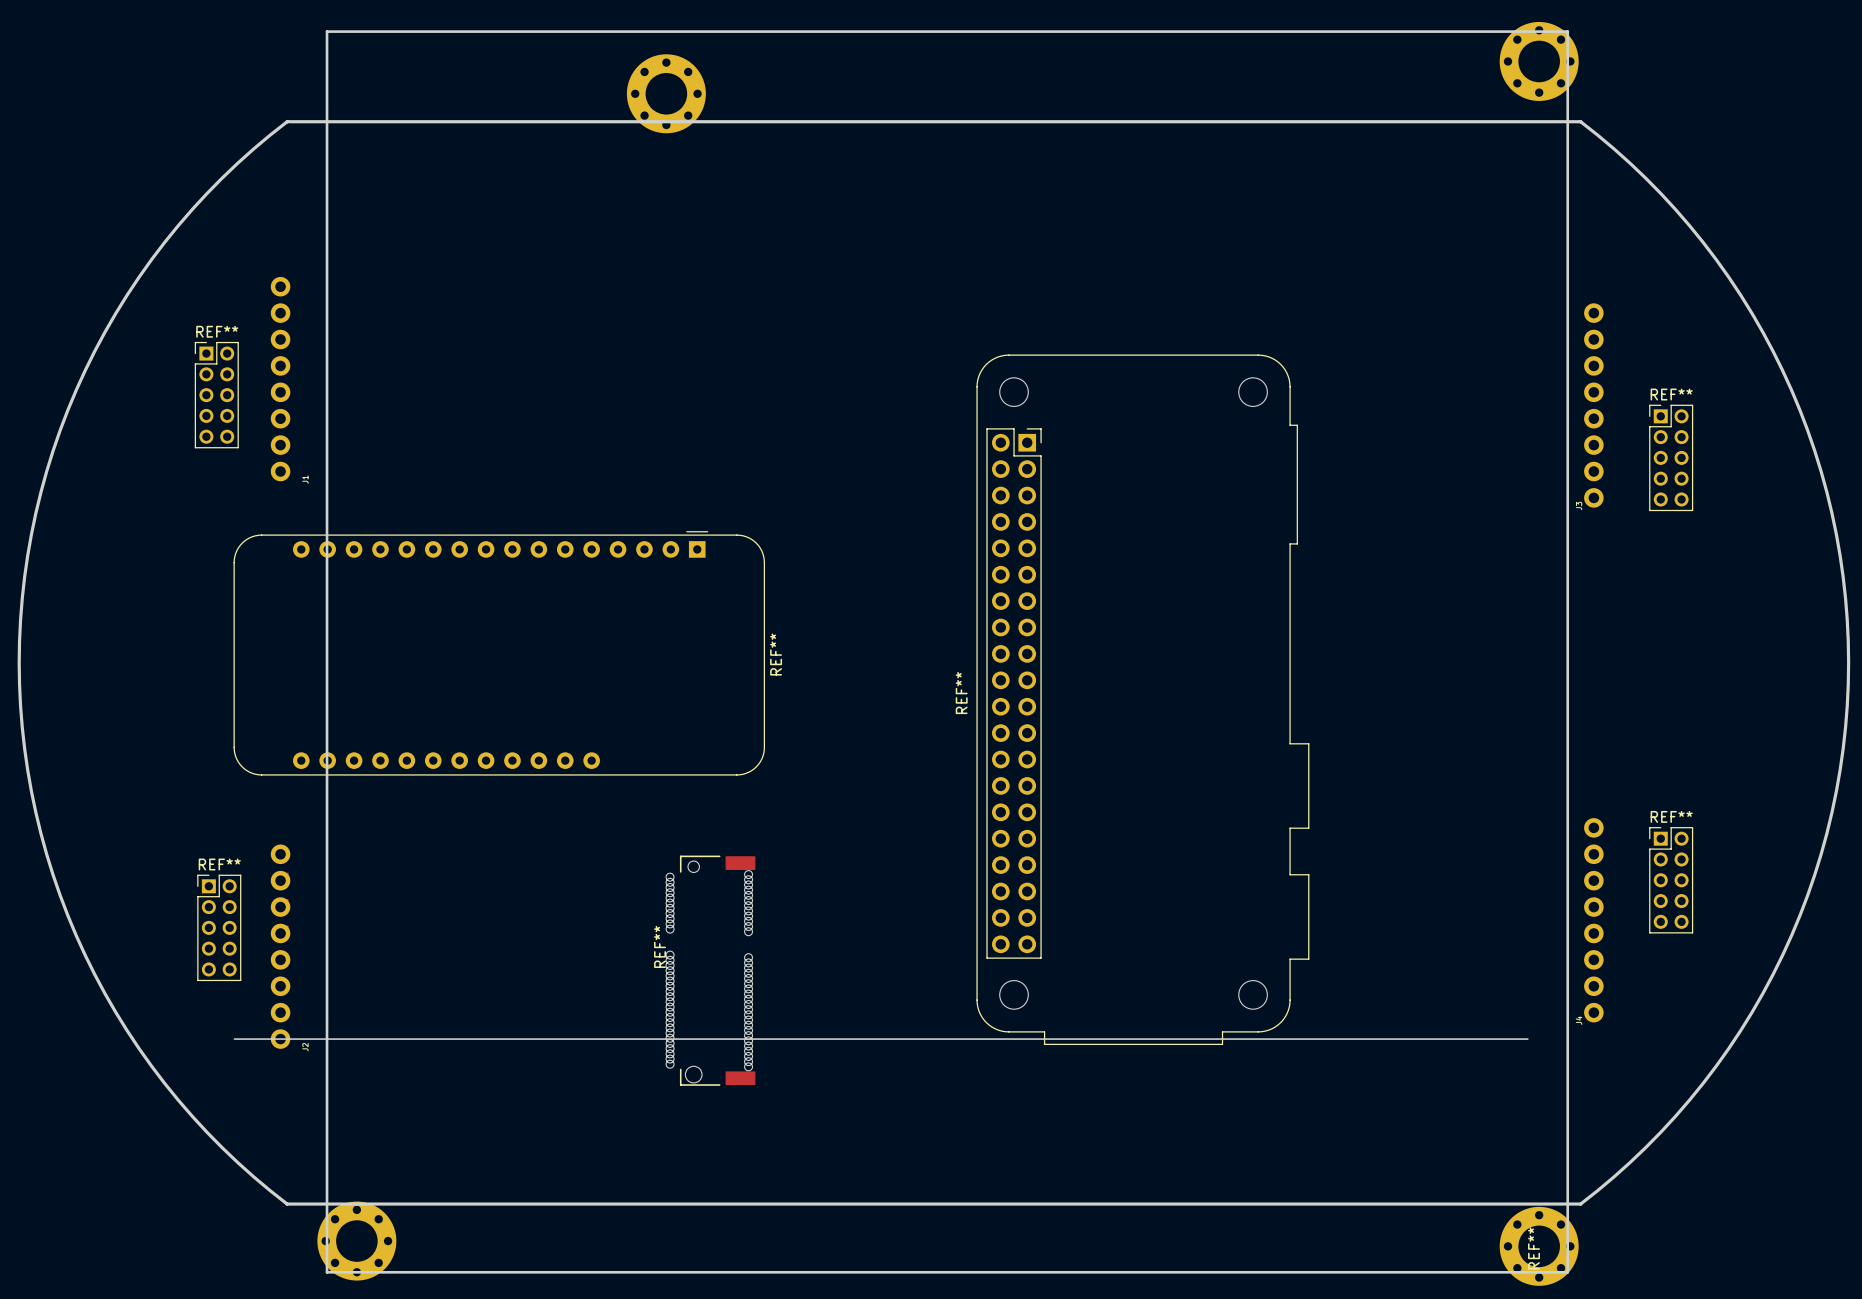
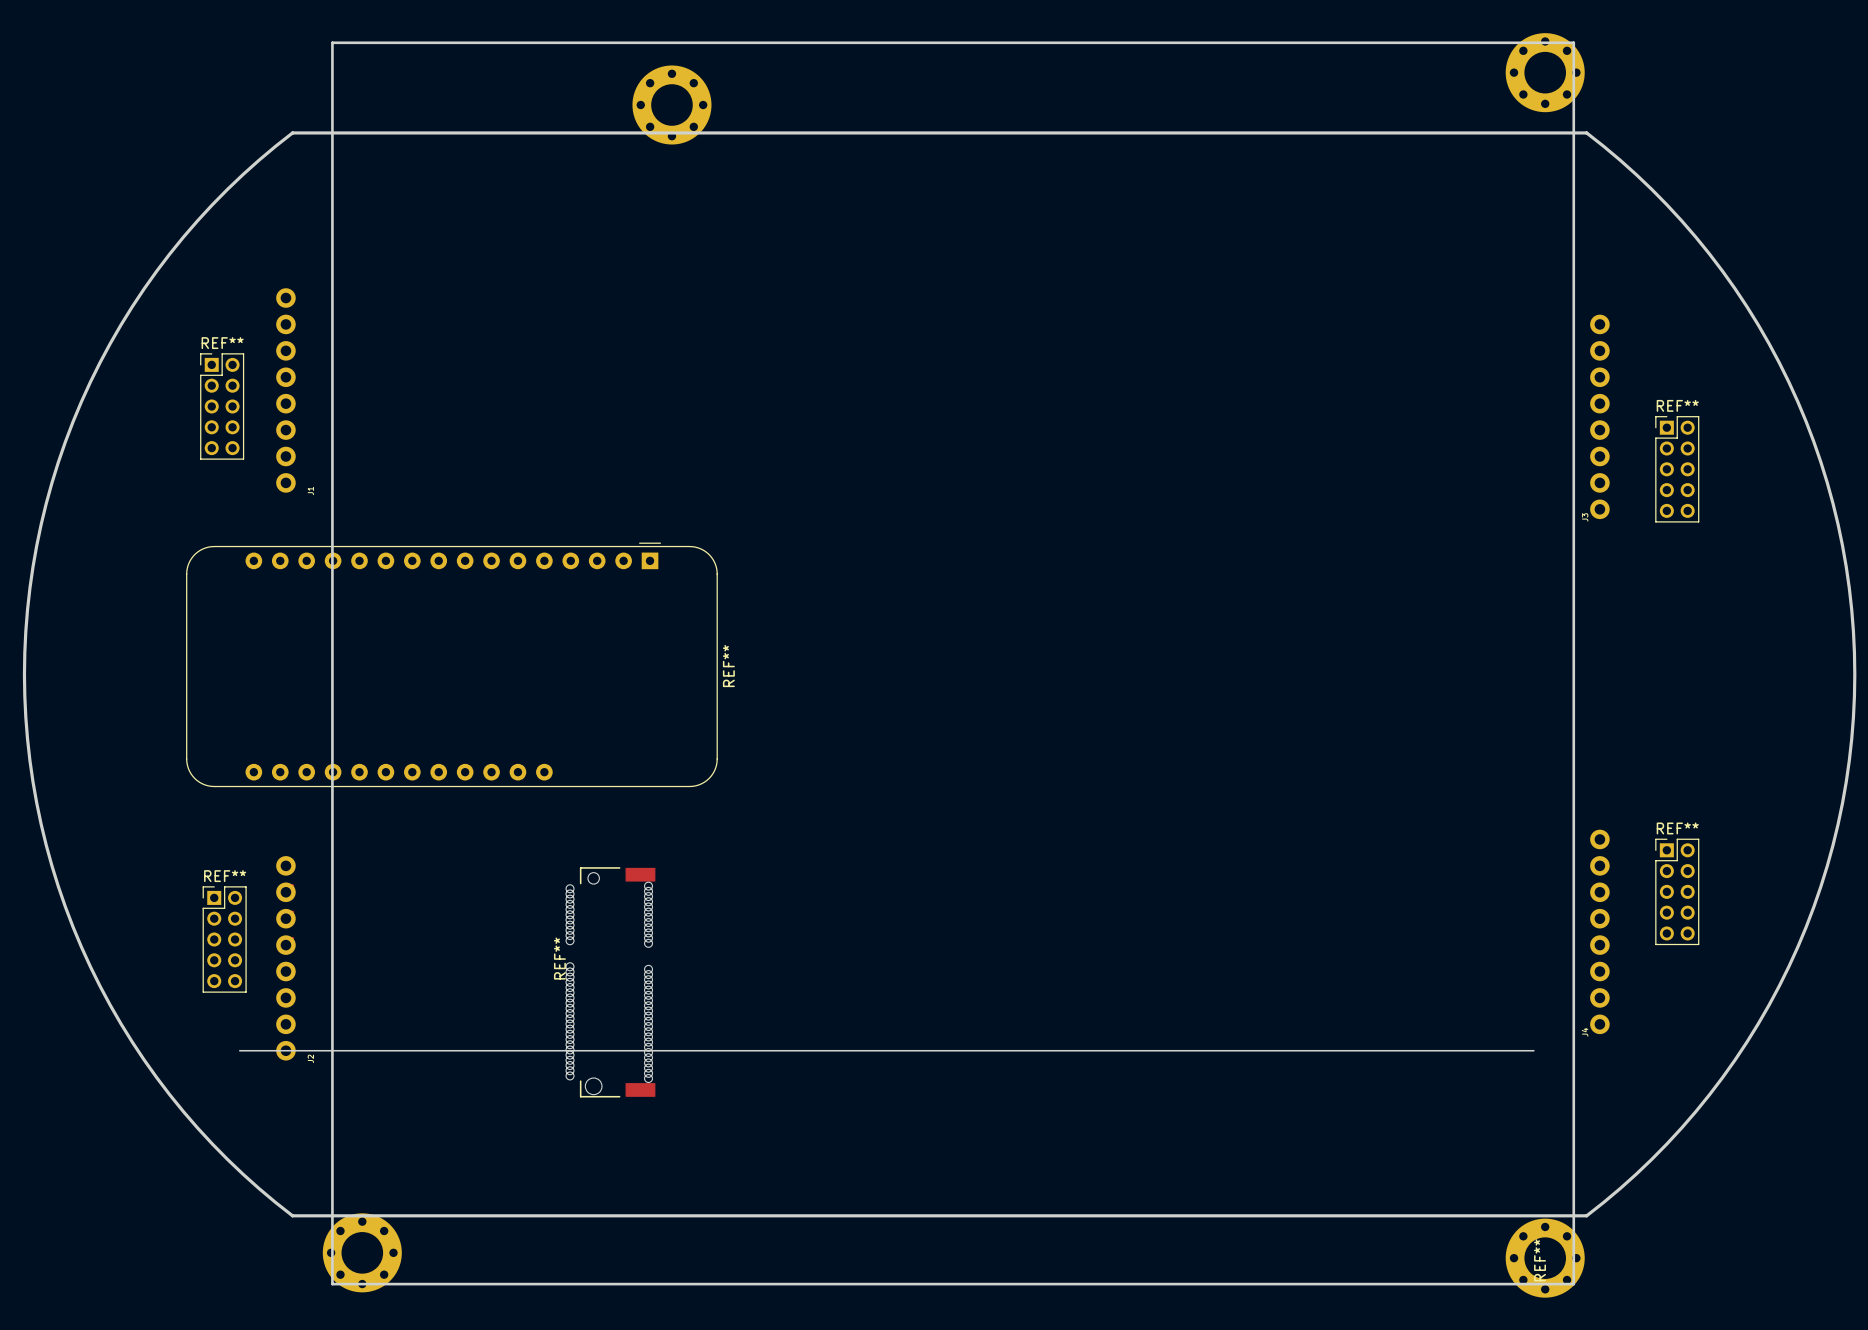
REF** position: (499, 653) -> (451, 664)
REF**: (1142, 699) -> none
REF** position: (710, 970) -> (610, 982)

